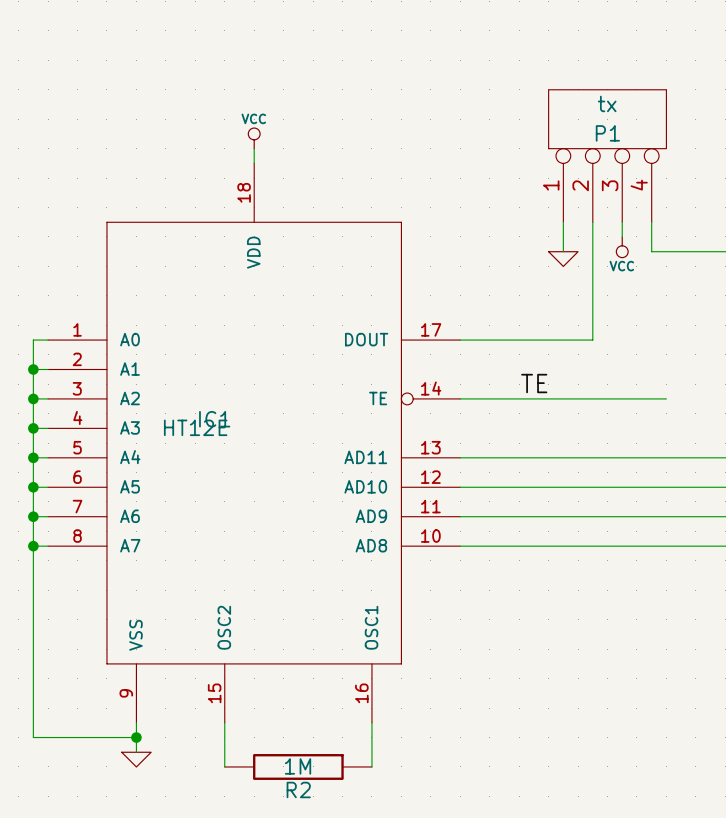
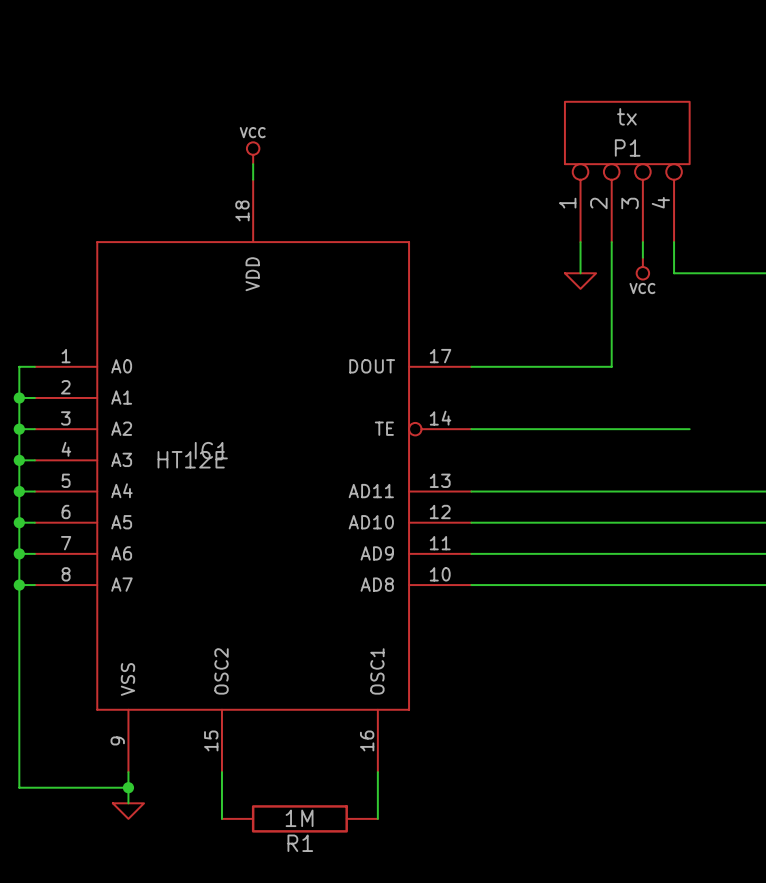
label: TE (534, 383) -> none
R2 name: R2 (298, 789) -> R1 (300, 843)

